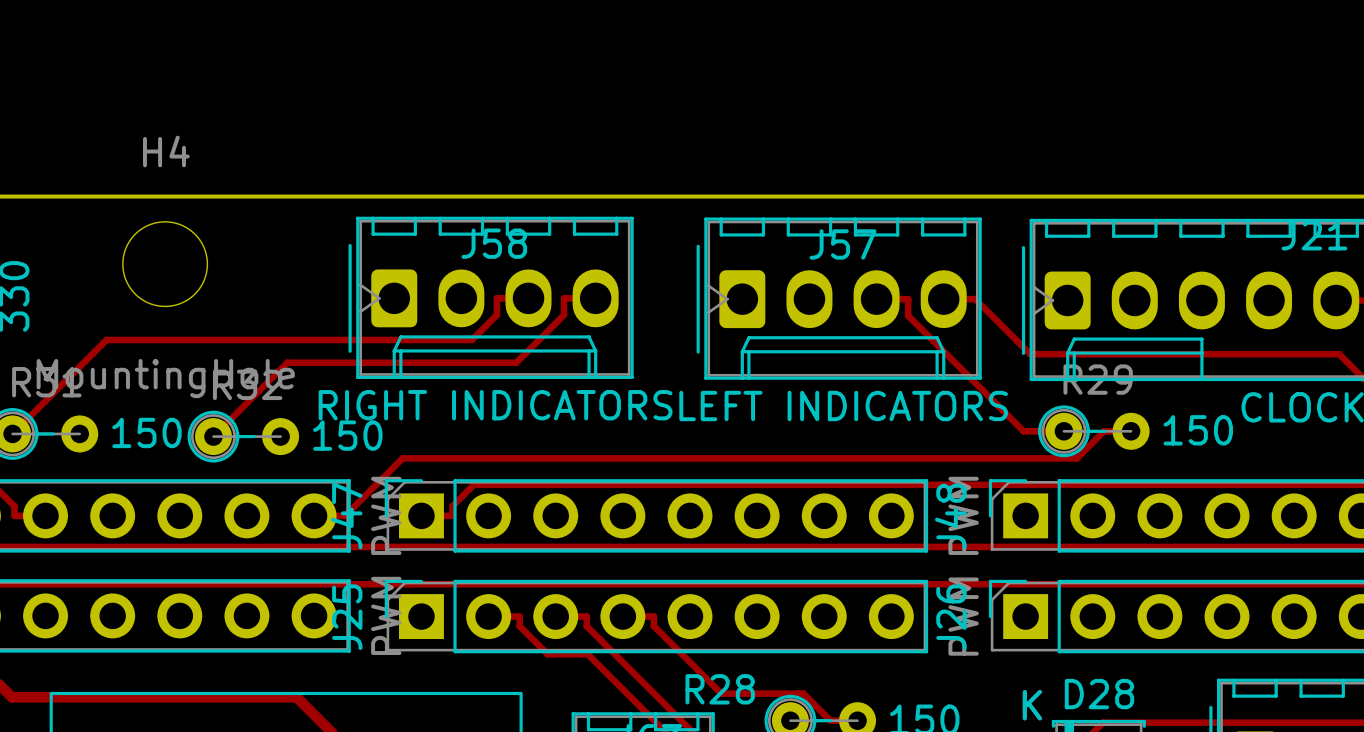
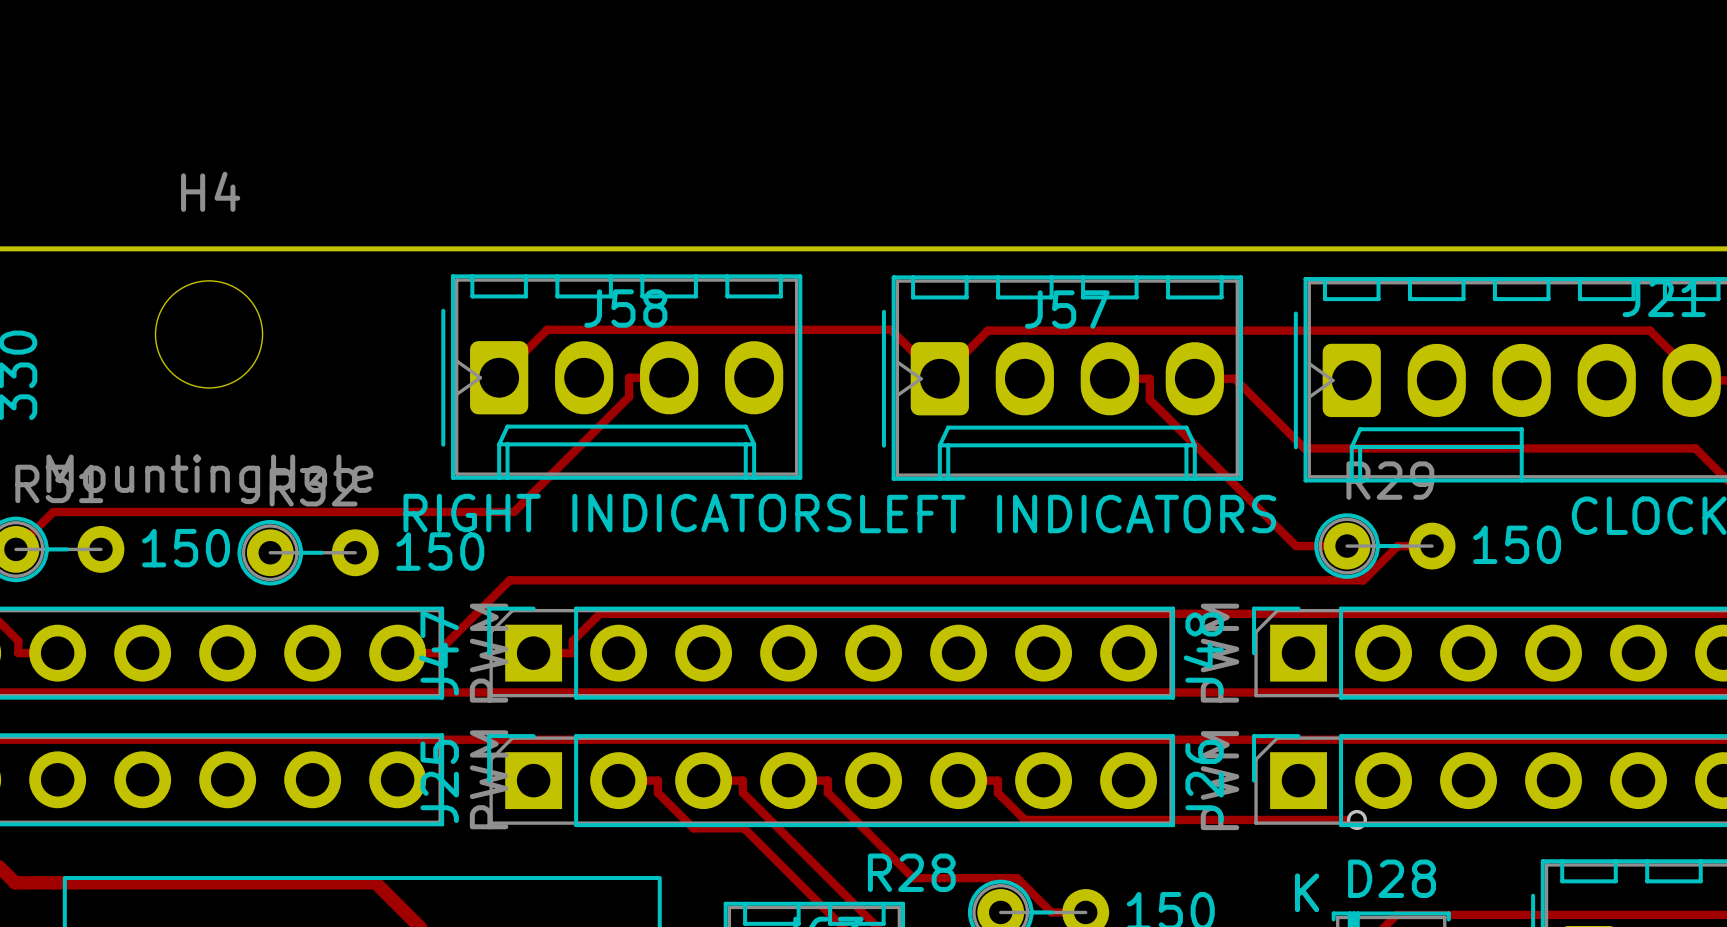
track: none -> (499, 377) (547, 329) (890, 329) (939, 378) (987, 330) (1649, 330) (1699, 380)
track: (595, 298) (564, 298) (564, 315) (516, 362) (287, 362) (213, 436) -> none
track: (496, 313) (471, 339) (106, 339) (42, 404) -> (629, 396) (514, 511) (53, 511)
track: none -> (958, 780) (997, 780) (997, 792) (1024, 819) (1356, 819)
via: none -> (1356, 819)

